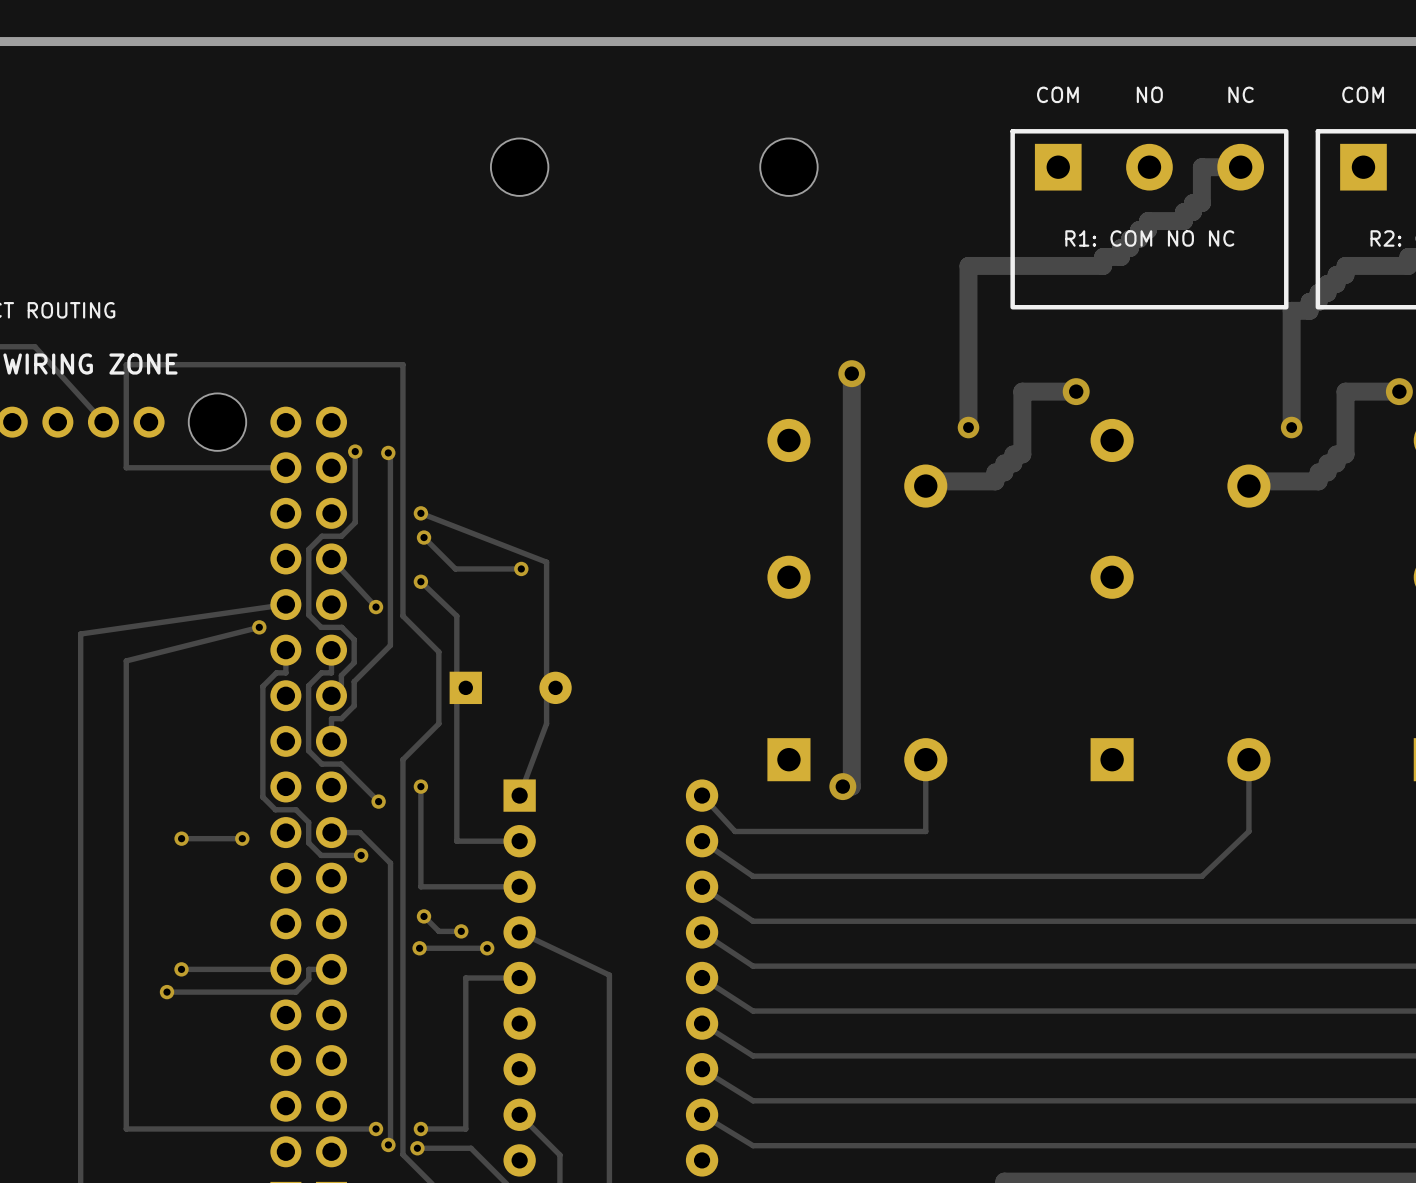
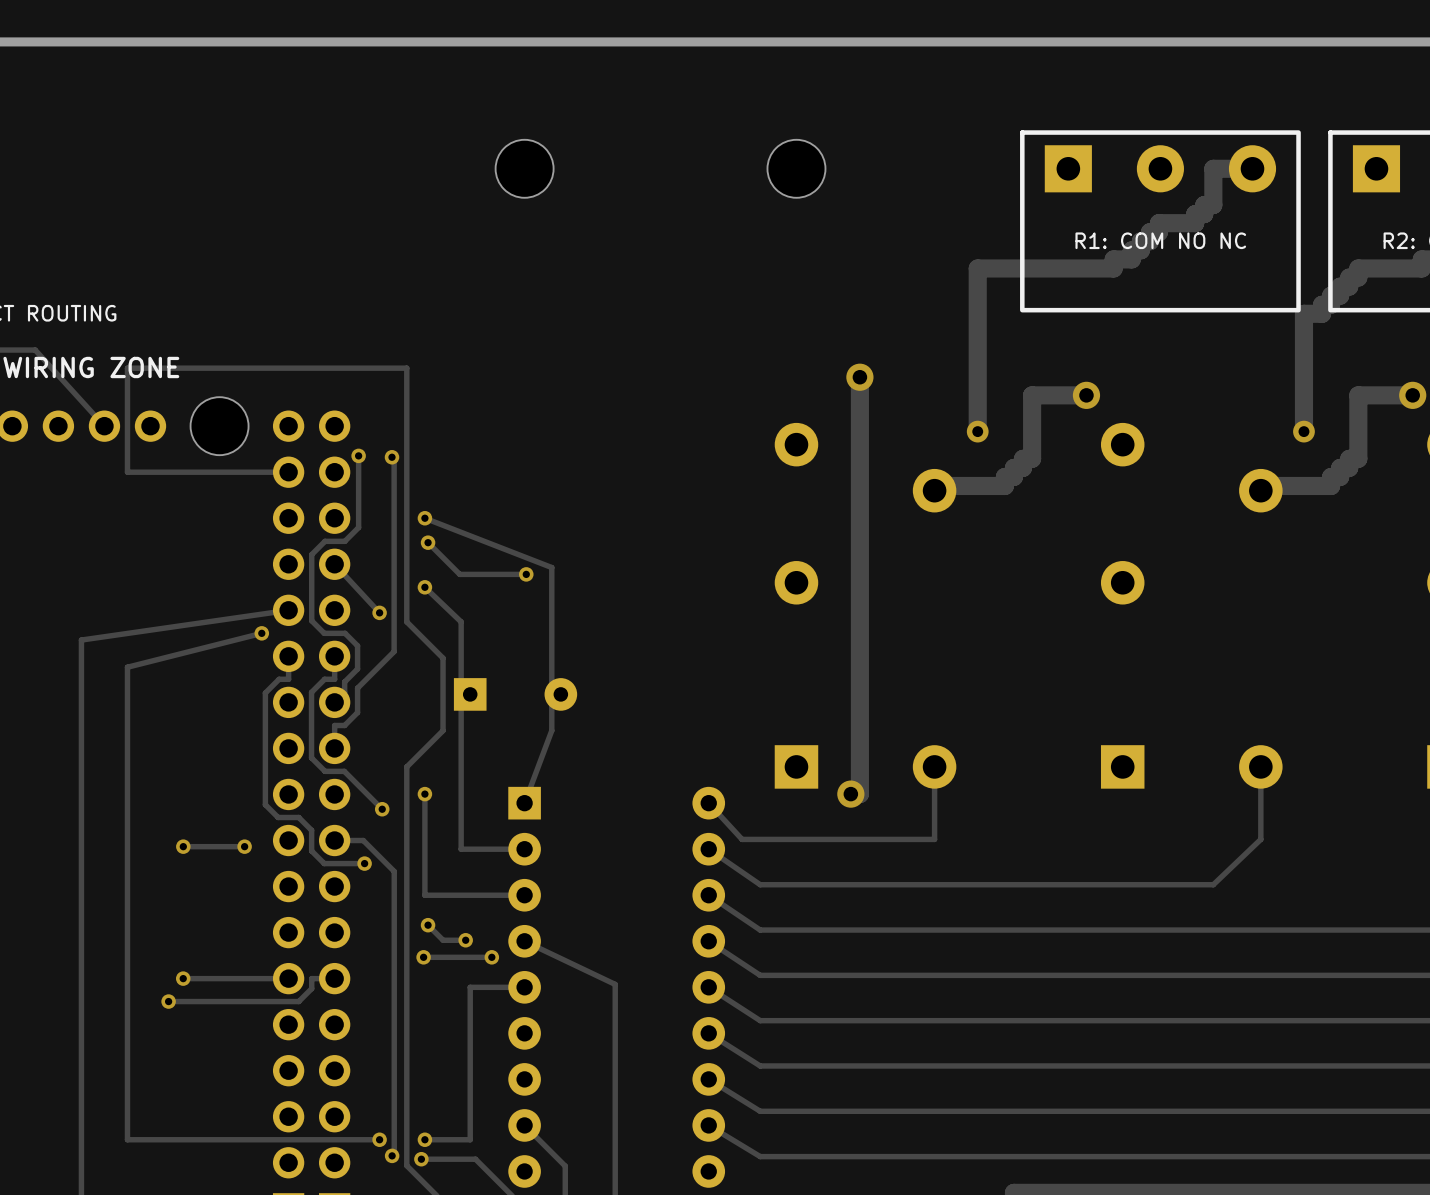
part text: COM (1057, 94) -> none
part text: NO (1149, 94) -> none
part text: NC (1241, 94) -> none
part text: COM (1363, 94) -> none

